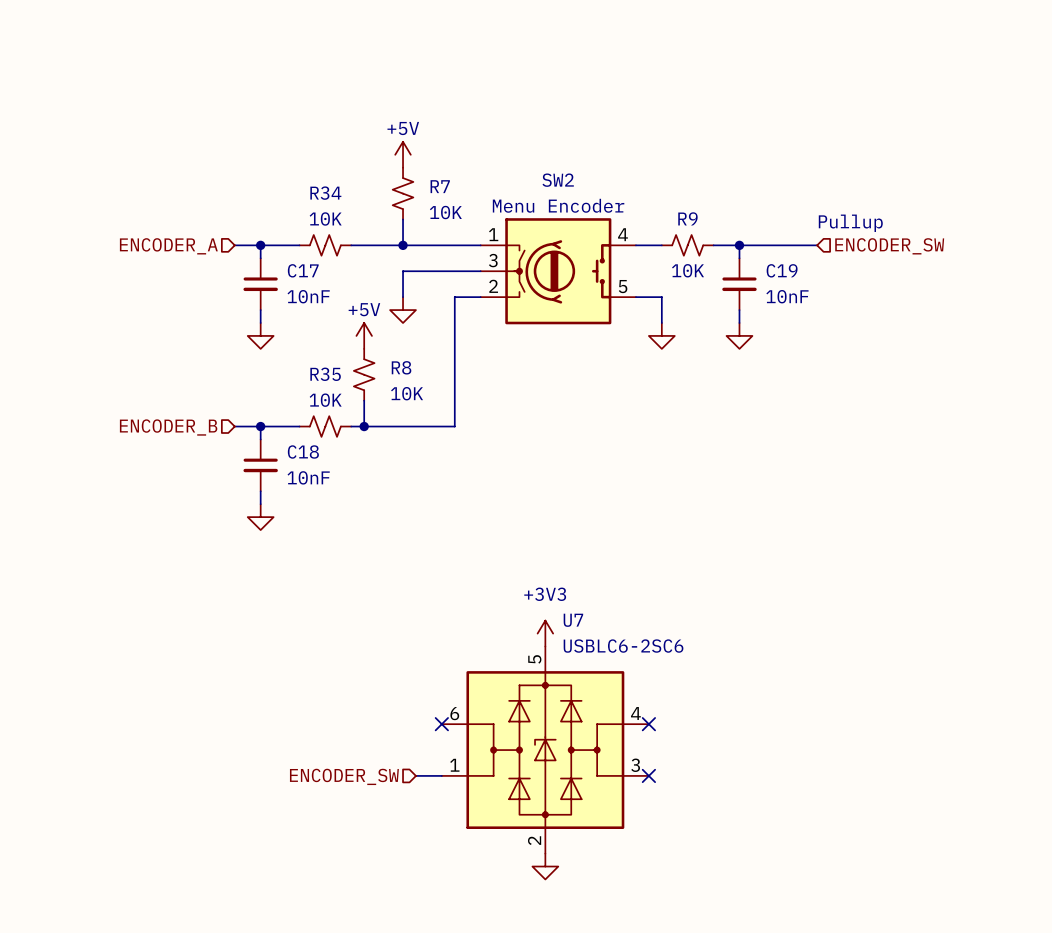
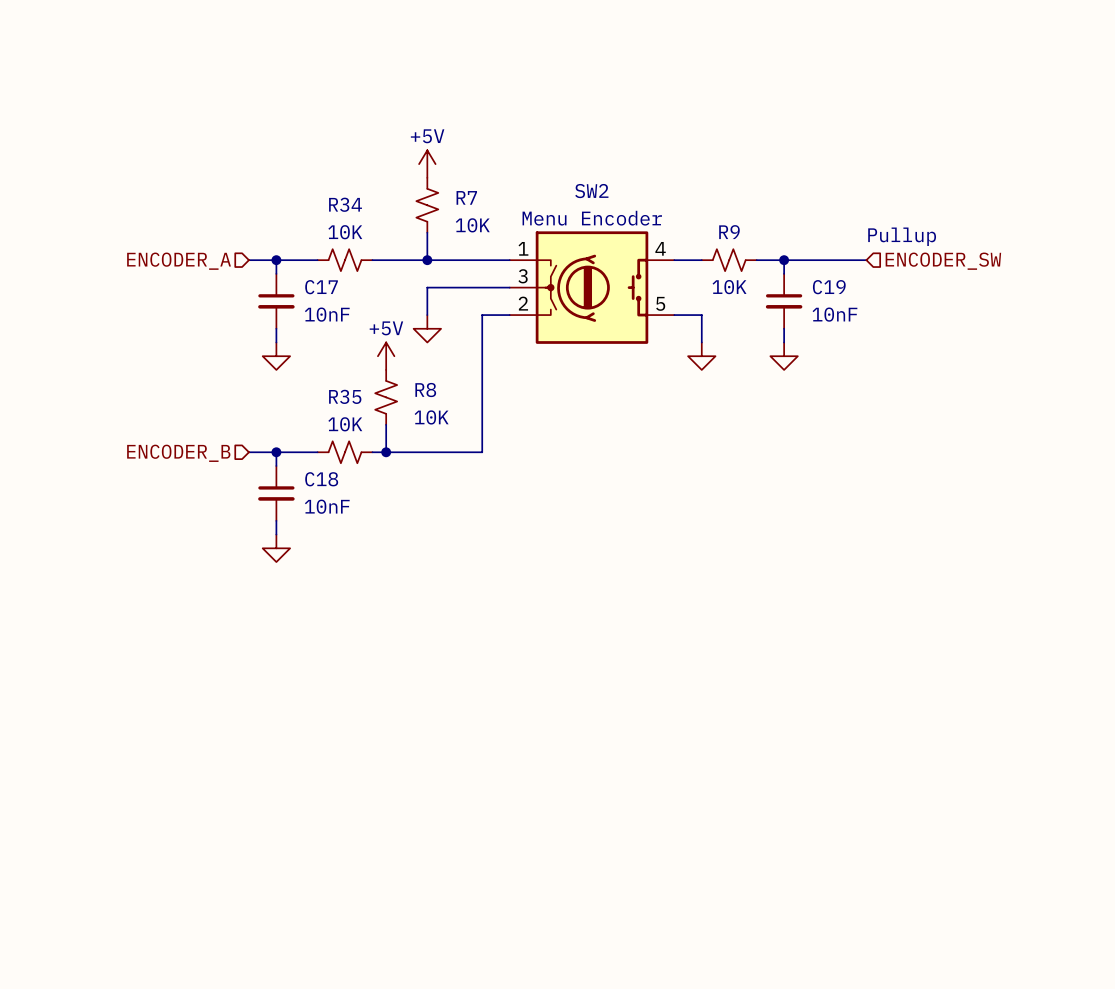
power symbol: +3V3 (545, 633) -> none
no-connect mark: (441, 724) -> none
no-connect mark: (648, 724) -> none
U7: USBLC6-2SC6 (545, 750) -> none
wire: (415, 775) (441, 775) -> none
no-connect mark: (648, 775) -> none
hierarchical label: ENCODER_SW (344, 776) -> none
power symbol: (545, 866) -> none

